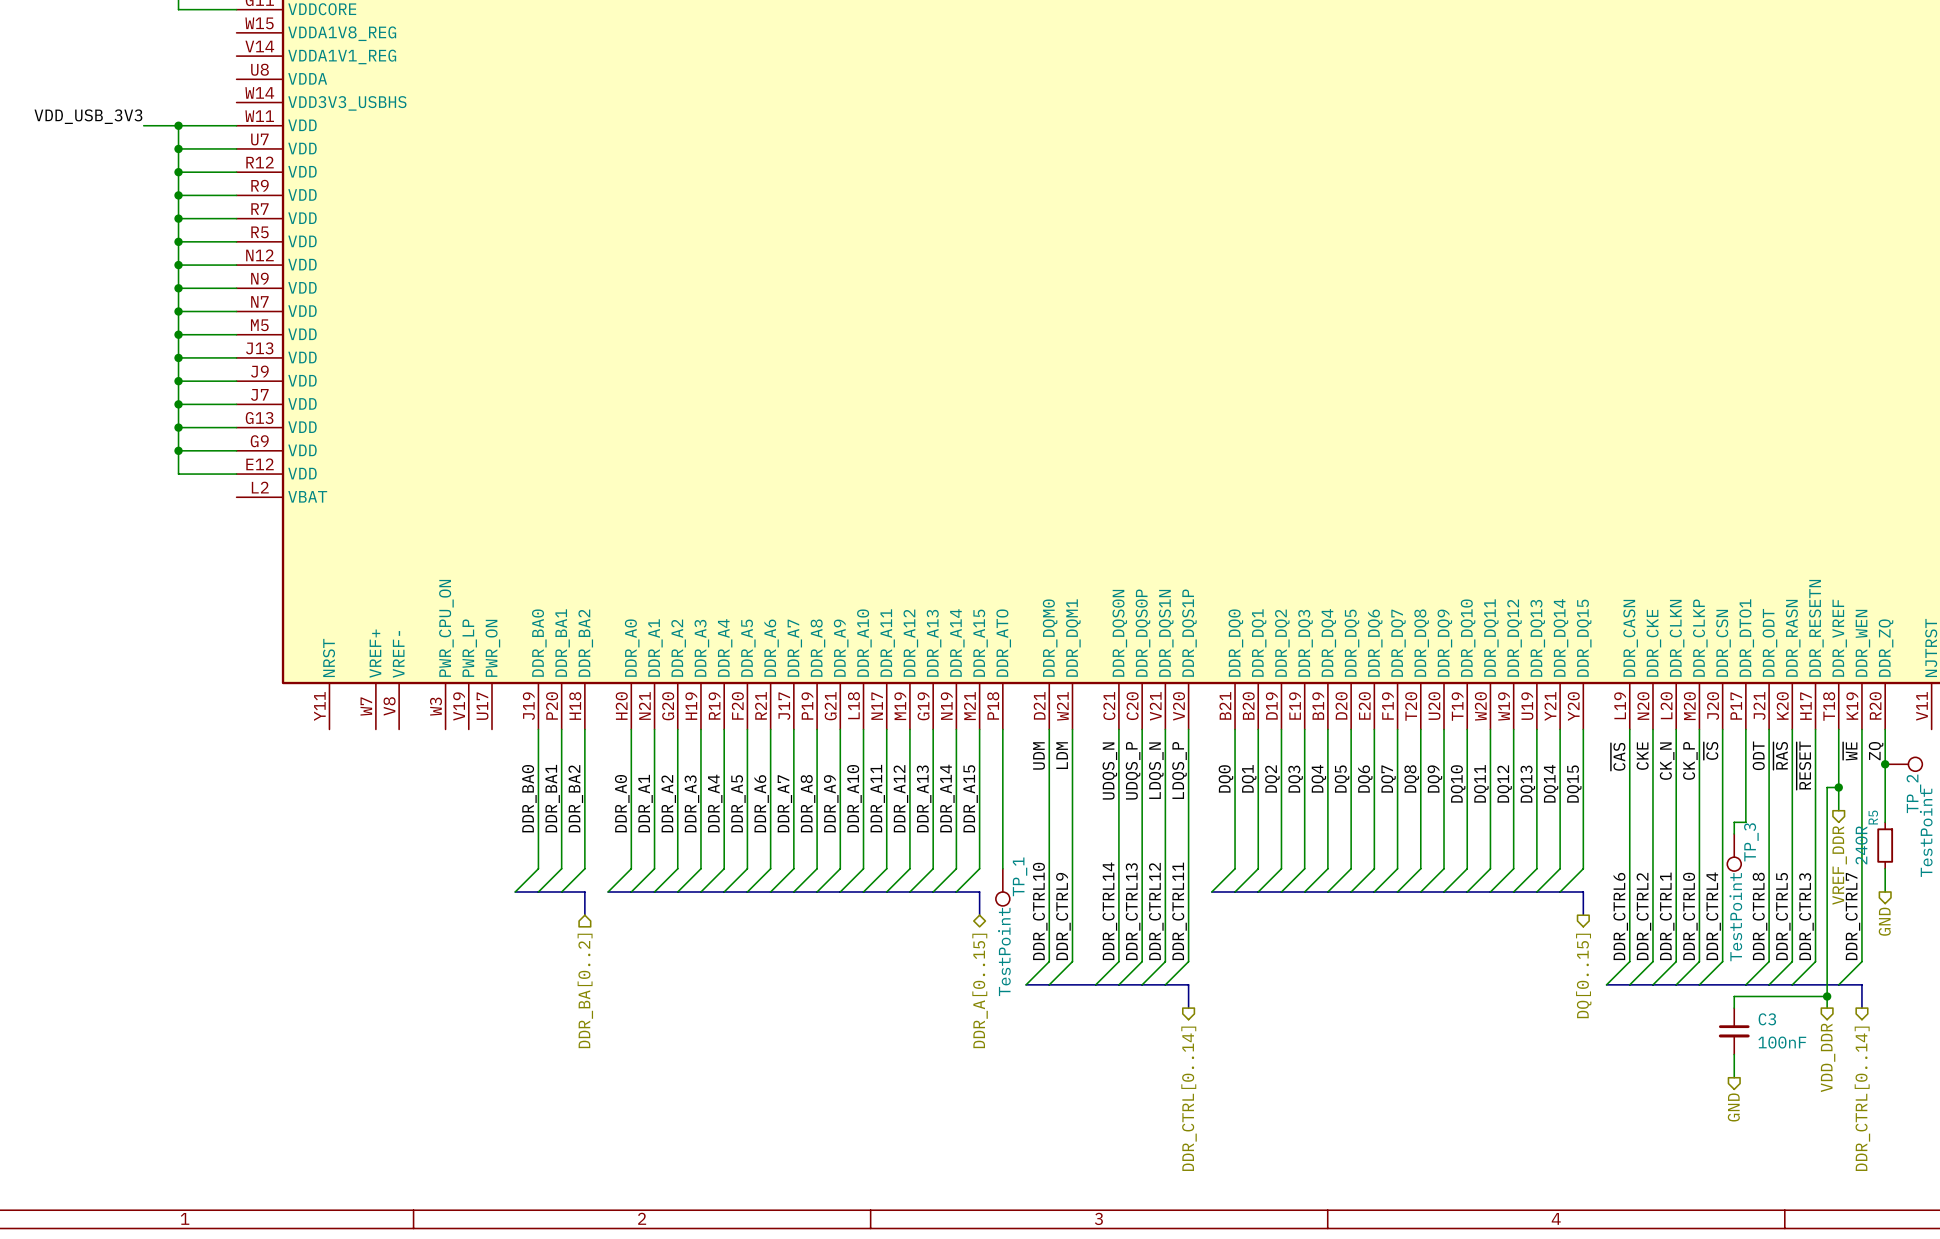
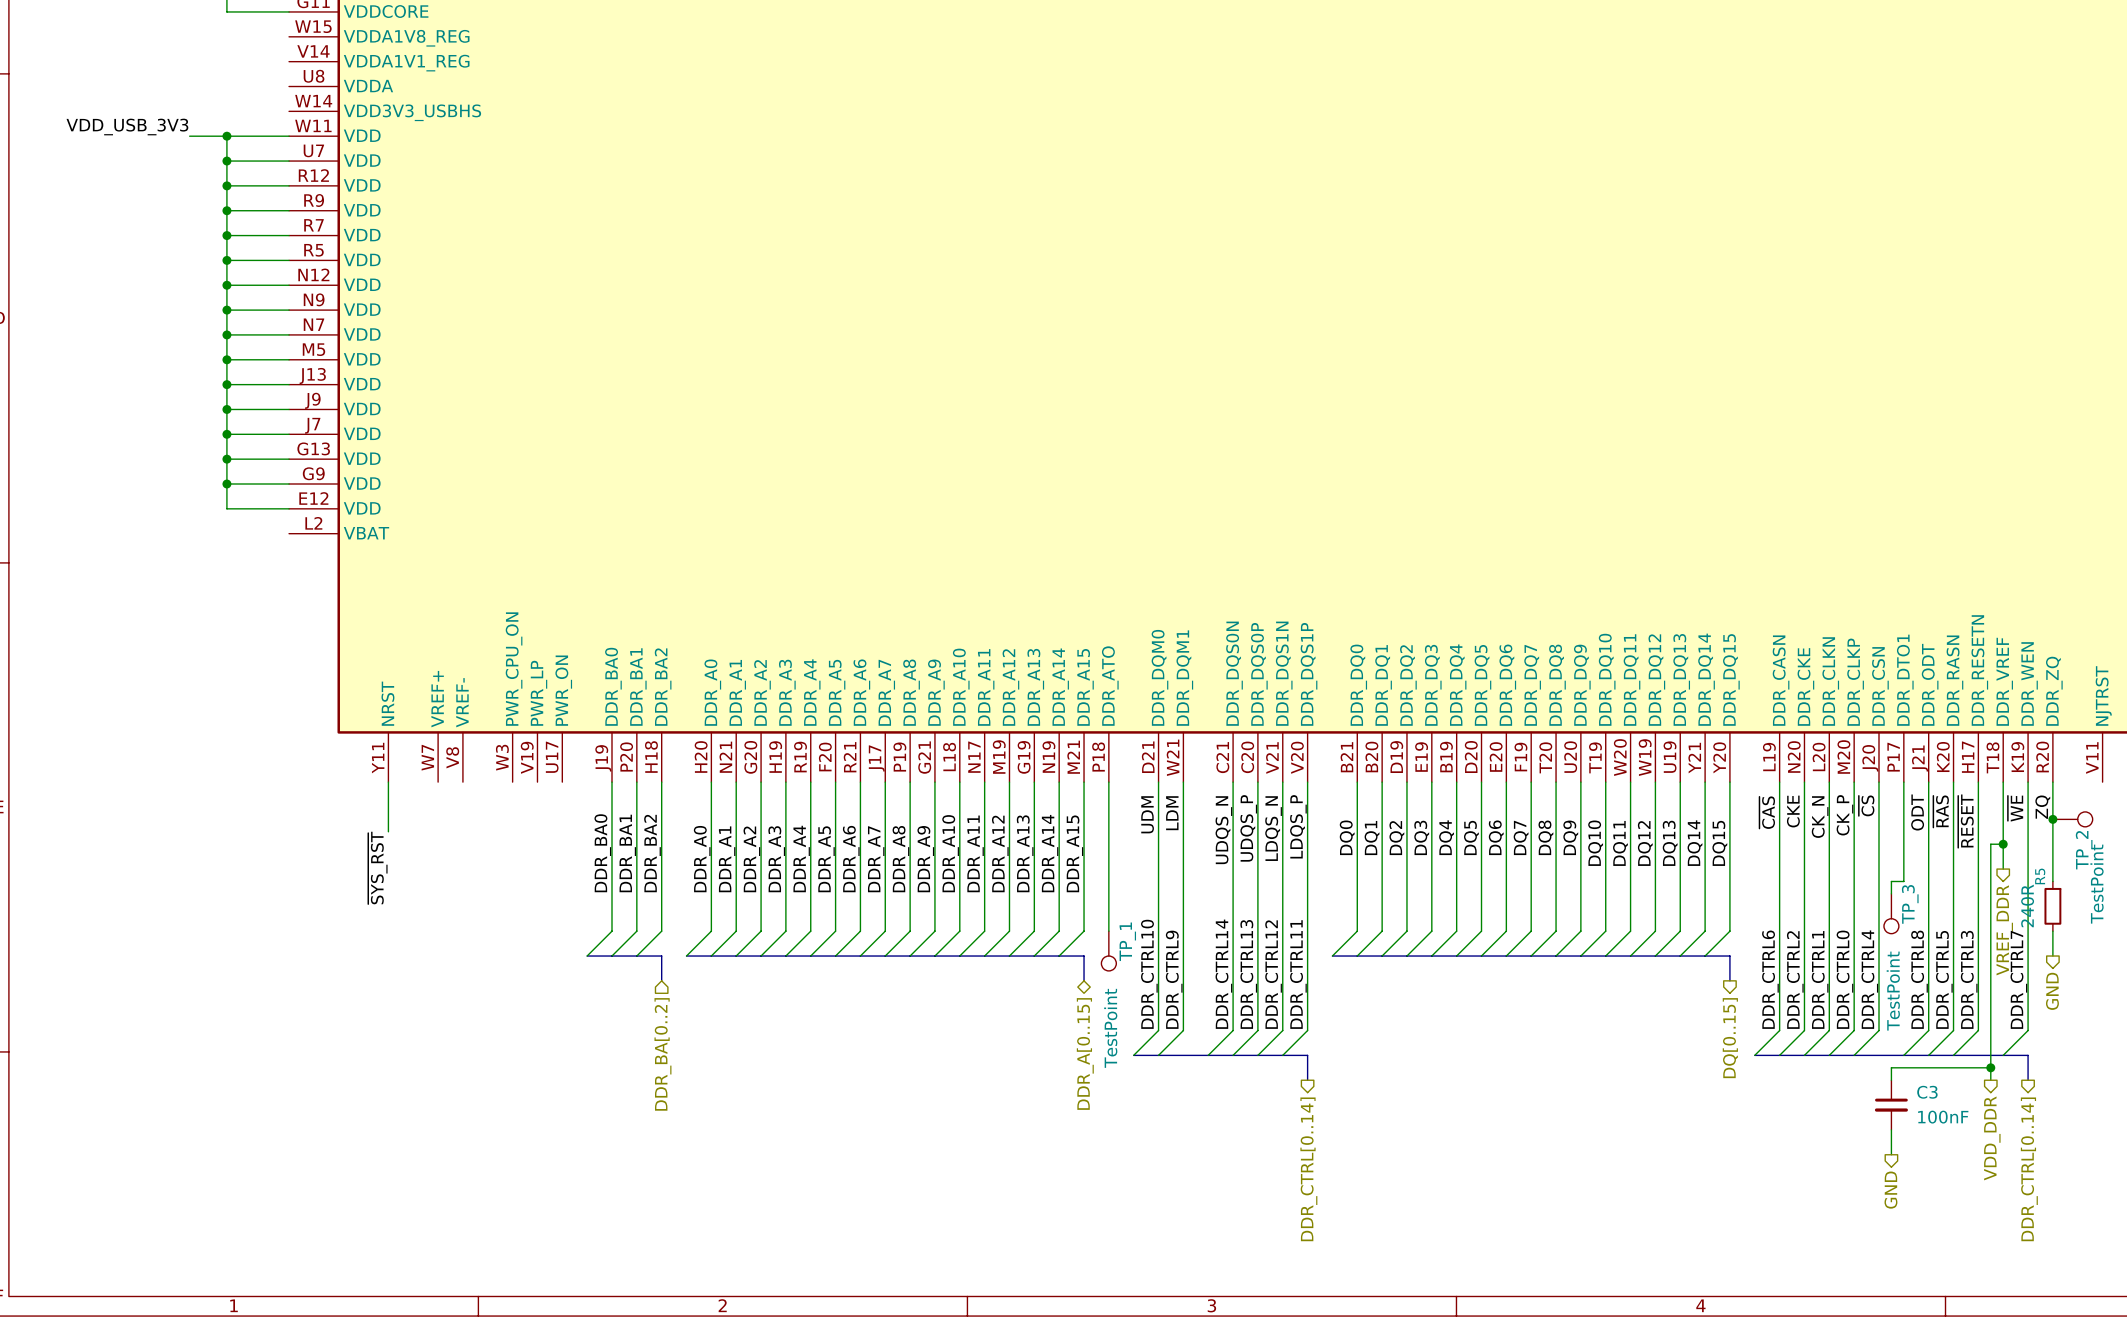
wire: none -> (388, 782) (388, 831)
label: none -> ~{SYS_RST} (377, 868)

